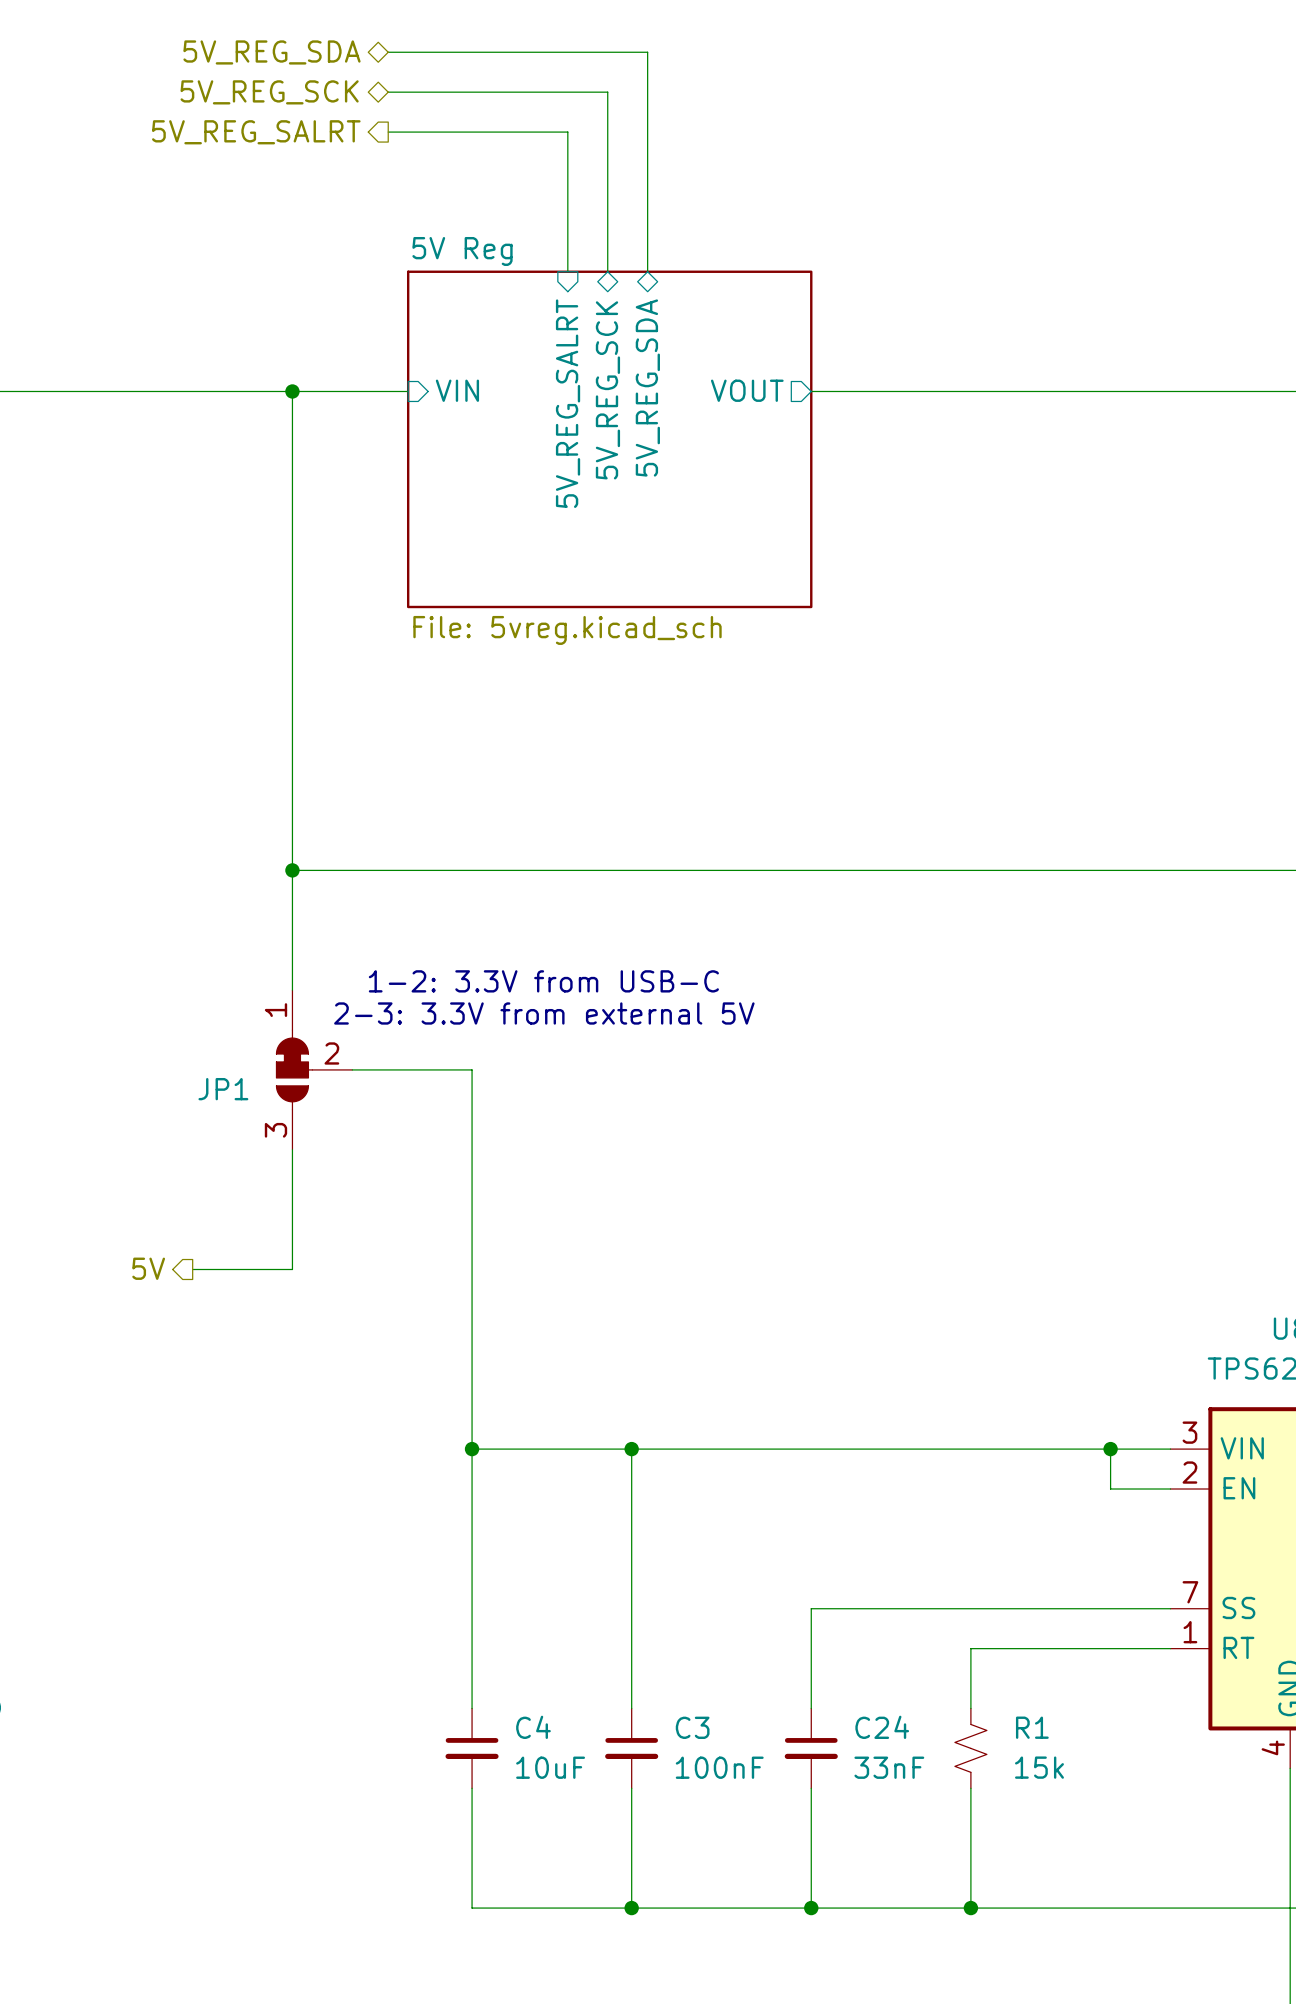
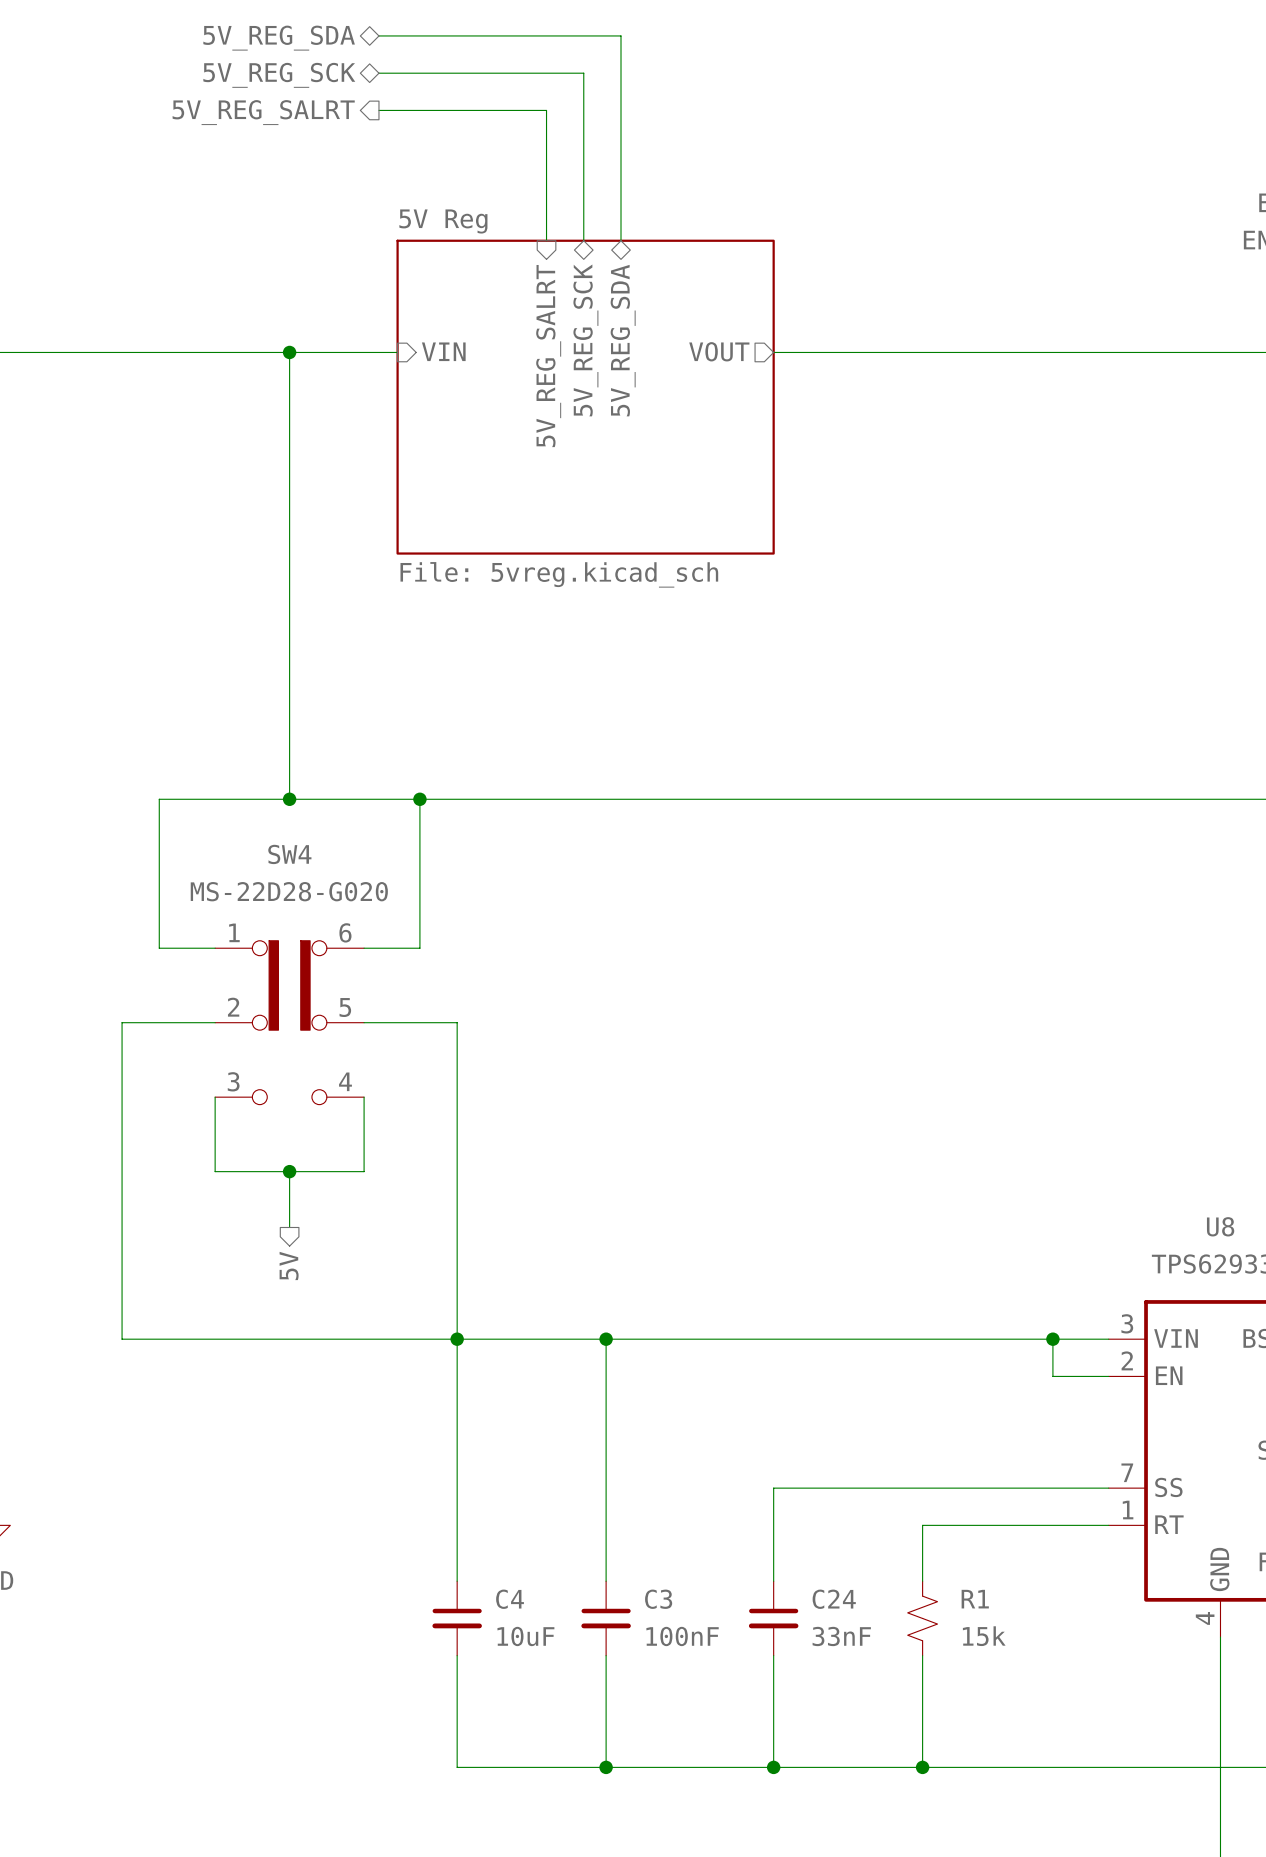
wire: (292, 870) (292, 990) -> (289, 799) (159, 799) (159, 948) (215, 948)
wire: none -> (419, 799) (419, 948) (364, 948)
junction: none -> (419, 799)
text: 1-2: 3.3V from USB-C (543, 981) -> none
text: 2-3: 3.3V from external 5V (544, 1013) -> none
JP1: (314, 1069) -> none
wire: (352, 1069) (472, 1069) (472, 1109) -> (364, 1022) (457, 1022)
wire: none -> (215, 1022) (122, 1022) (122, 1339) (457, 1339)
SW4: none -> MS-22D28-G020 (289, 1022)
wire: (292, 1149) (292, 1269) -> none
wire: none -> (364, 1097) (364, 1171) (289, 1171) (289, 1227)
hierarchical label rotation: 0° (148, 1268) -> 90° counterclockwise (289, 1265)
hierarchical label position: 5V (148, 1268) -> 5V (289, 1265)
wire: (192, 1269) (212, 1269) -> (215, 1097) (215, 1171)
junction: none -> (289, 1171)

